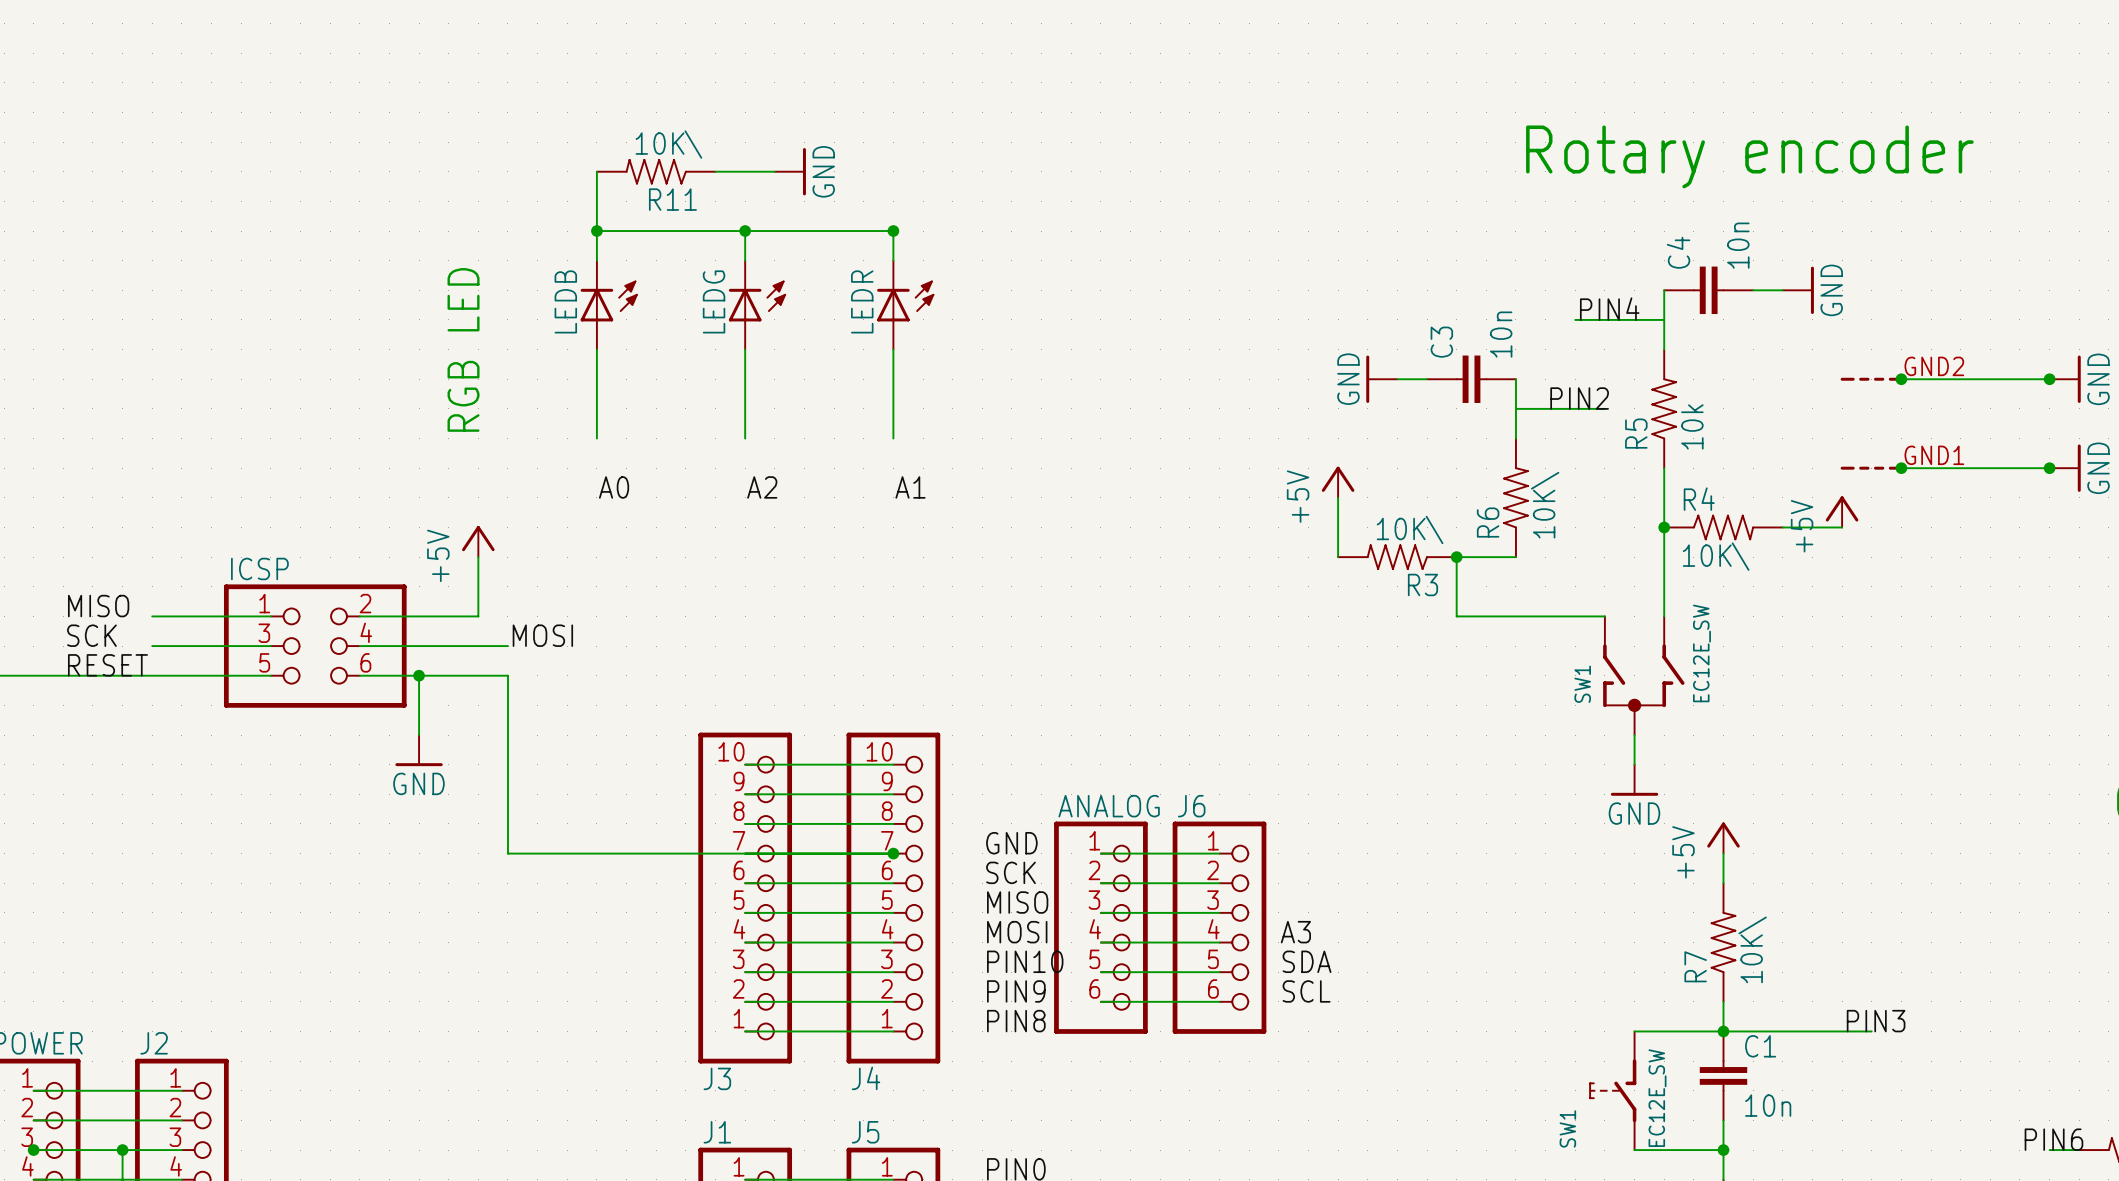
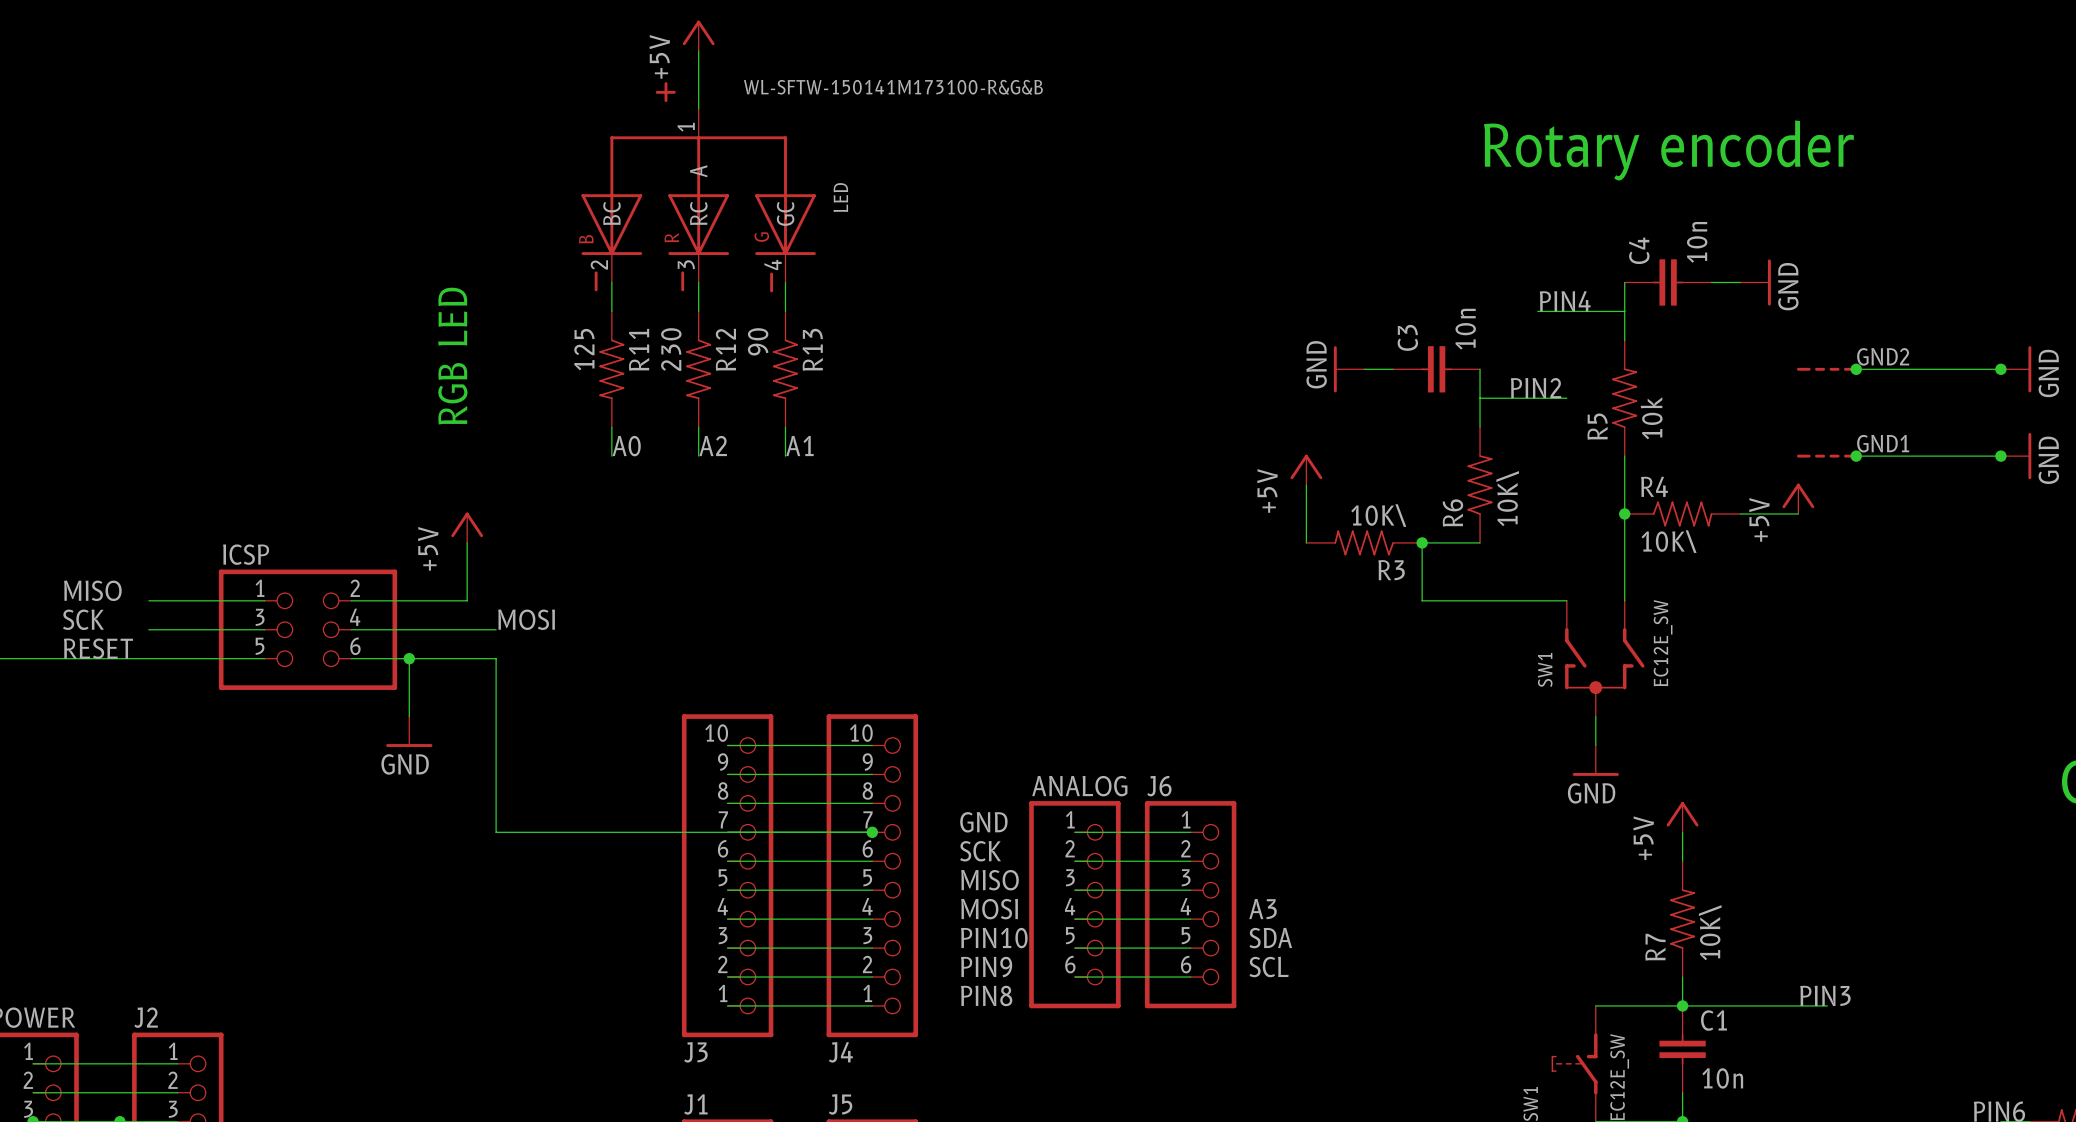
power symbol: none -> +5V (698, 35)
wire: none -> (698, 50) (698, 108)
R11 value: 10K\ (668, 144) -> 125 (584, 349)
wire: (596, 171) (596, 260) -> none
R11 rotation: 0° (656, 171) -> 90° counterclockwise (611, 369)
R11 position: (656, 171) -> (611, 369)
wire: (715, 171) (774, 171) -> none
power symbol: GND (790, 171) -> none
LED: none -> WL-SFTW-150141M173100-R&G&B (698, 187)
wire: (596, 231) (893, 231) (893, 260) -> none
junction: (596, 231) -> none
wire: (745, 231) (745, 260) -> (698, 282) (698, 311)
junction: (745, 231) -> none
junction: (893, 231) -> none
wire: none -> (611, 282) (611, 311)
wire: none -> (785, 282) (785, 311)
LEDB: (609, 305) -> none
LEDG: (757, 305) -> none
LEDR: (905, 305) -> none
wire: (596, 349) (596, 438) -> none
wire: (745, 349) (745, 438) -> none
wire: (893, 349) (893, 438) -> none
R12: none -> 230 (698, 369)
R13: none -> 90 (785, 369)
wire: none -> (611, 427) (611, 456)
wire: none -> (698, 427) (698, 456)
wire: none -> (785, 427) (785, 456)
label position: A0 (614, 487) -> A0 (626, 446)
label position: A2 (762, 487) -> A2 (713, 445)
label position: A1 (910, 487) -> A1 (799, 445)

